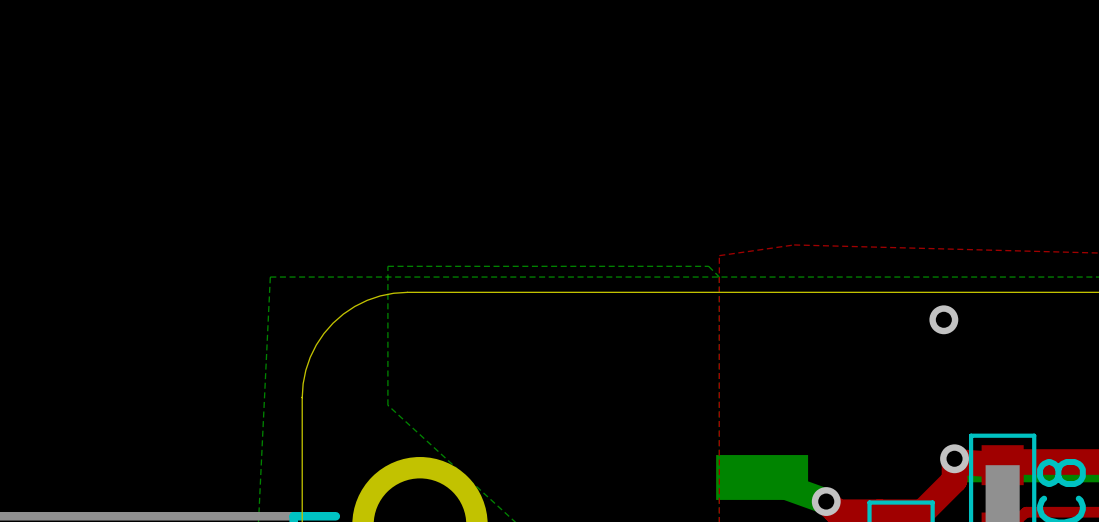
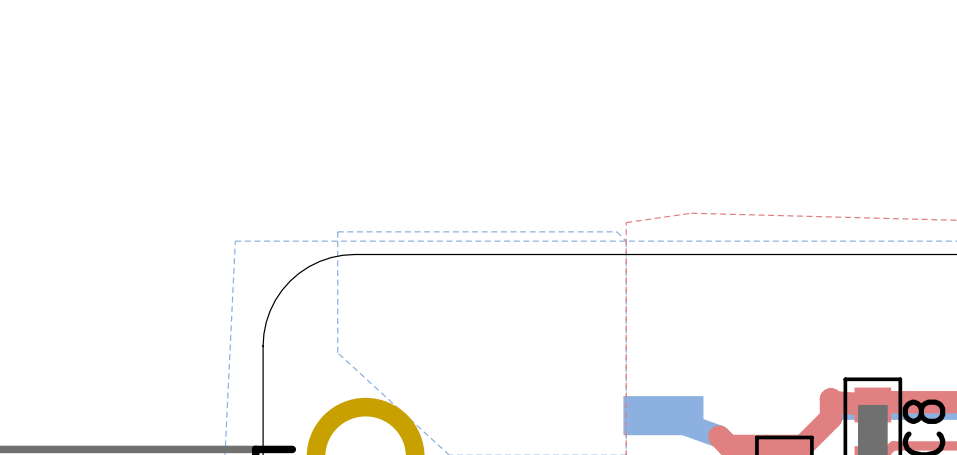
via: (943, 319) -> none
via: (954, 458) -> none
via: (826, 501) -> none

